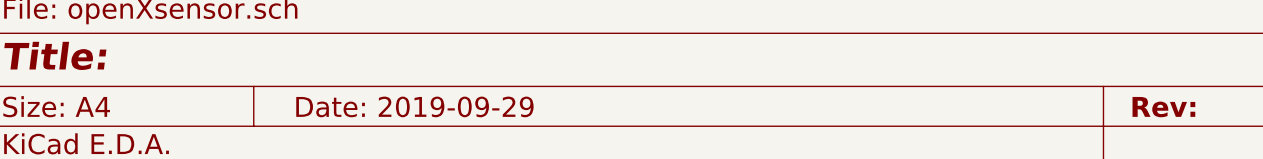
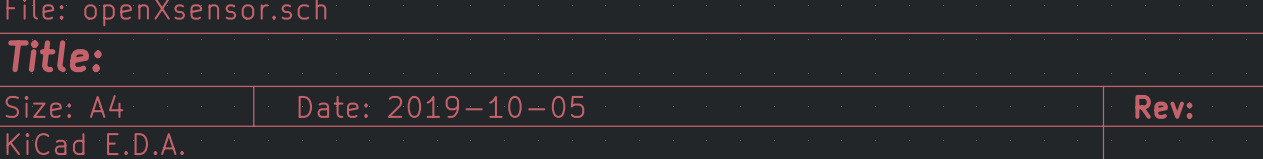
title block: Date: 2019-09-29 (414, 106) -> Date: 2019-10-05 (441, 106)

